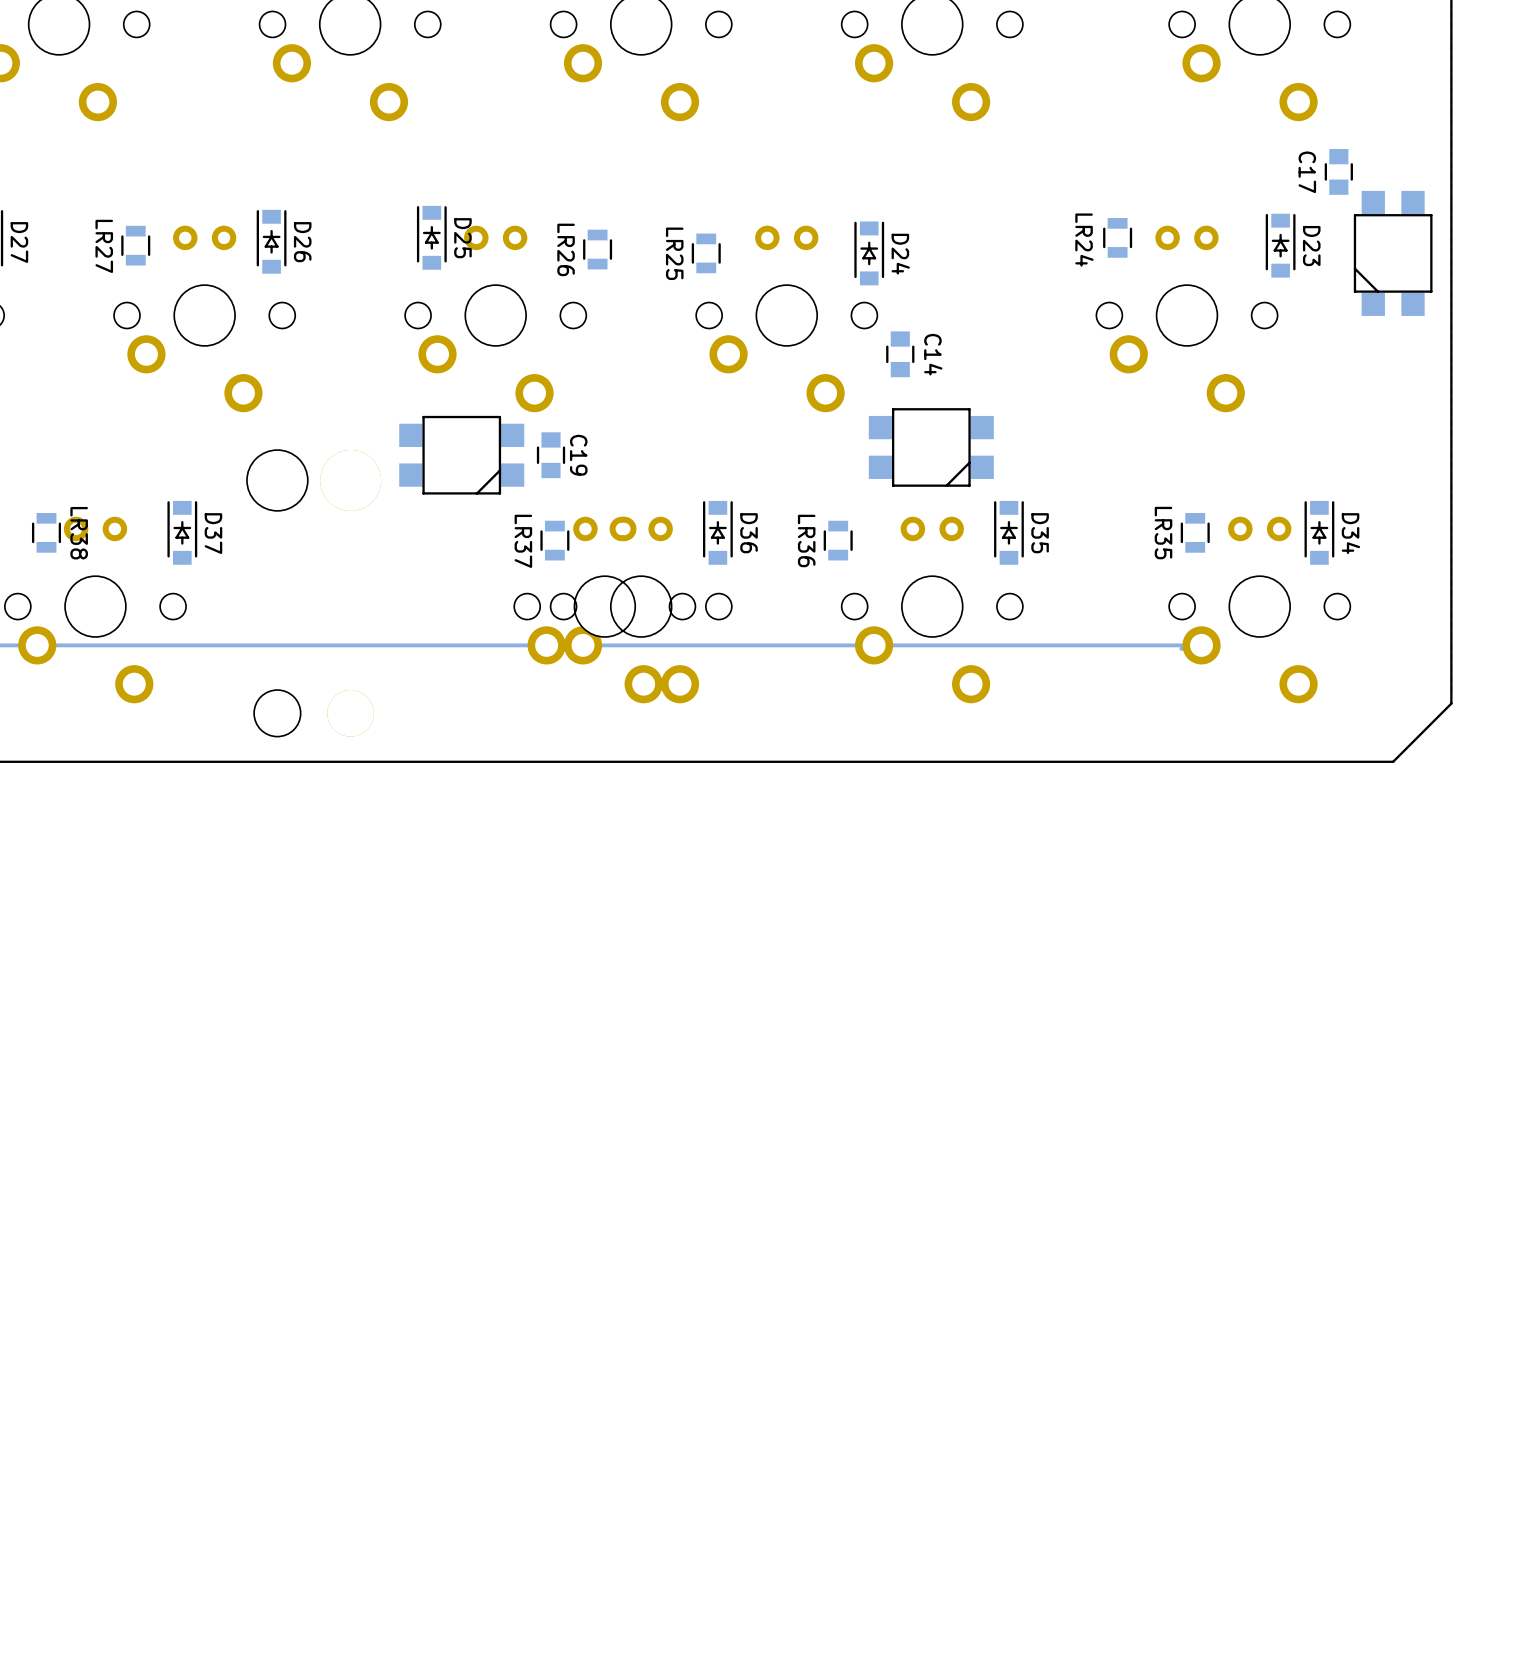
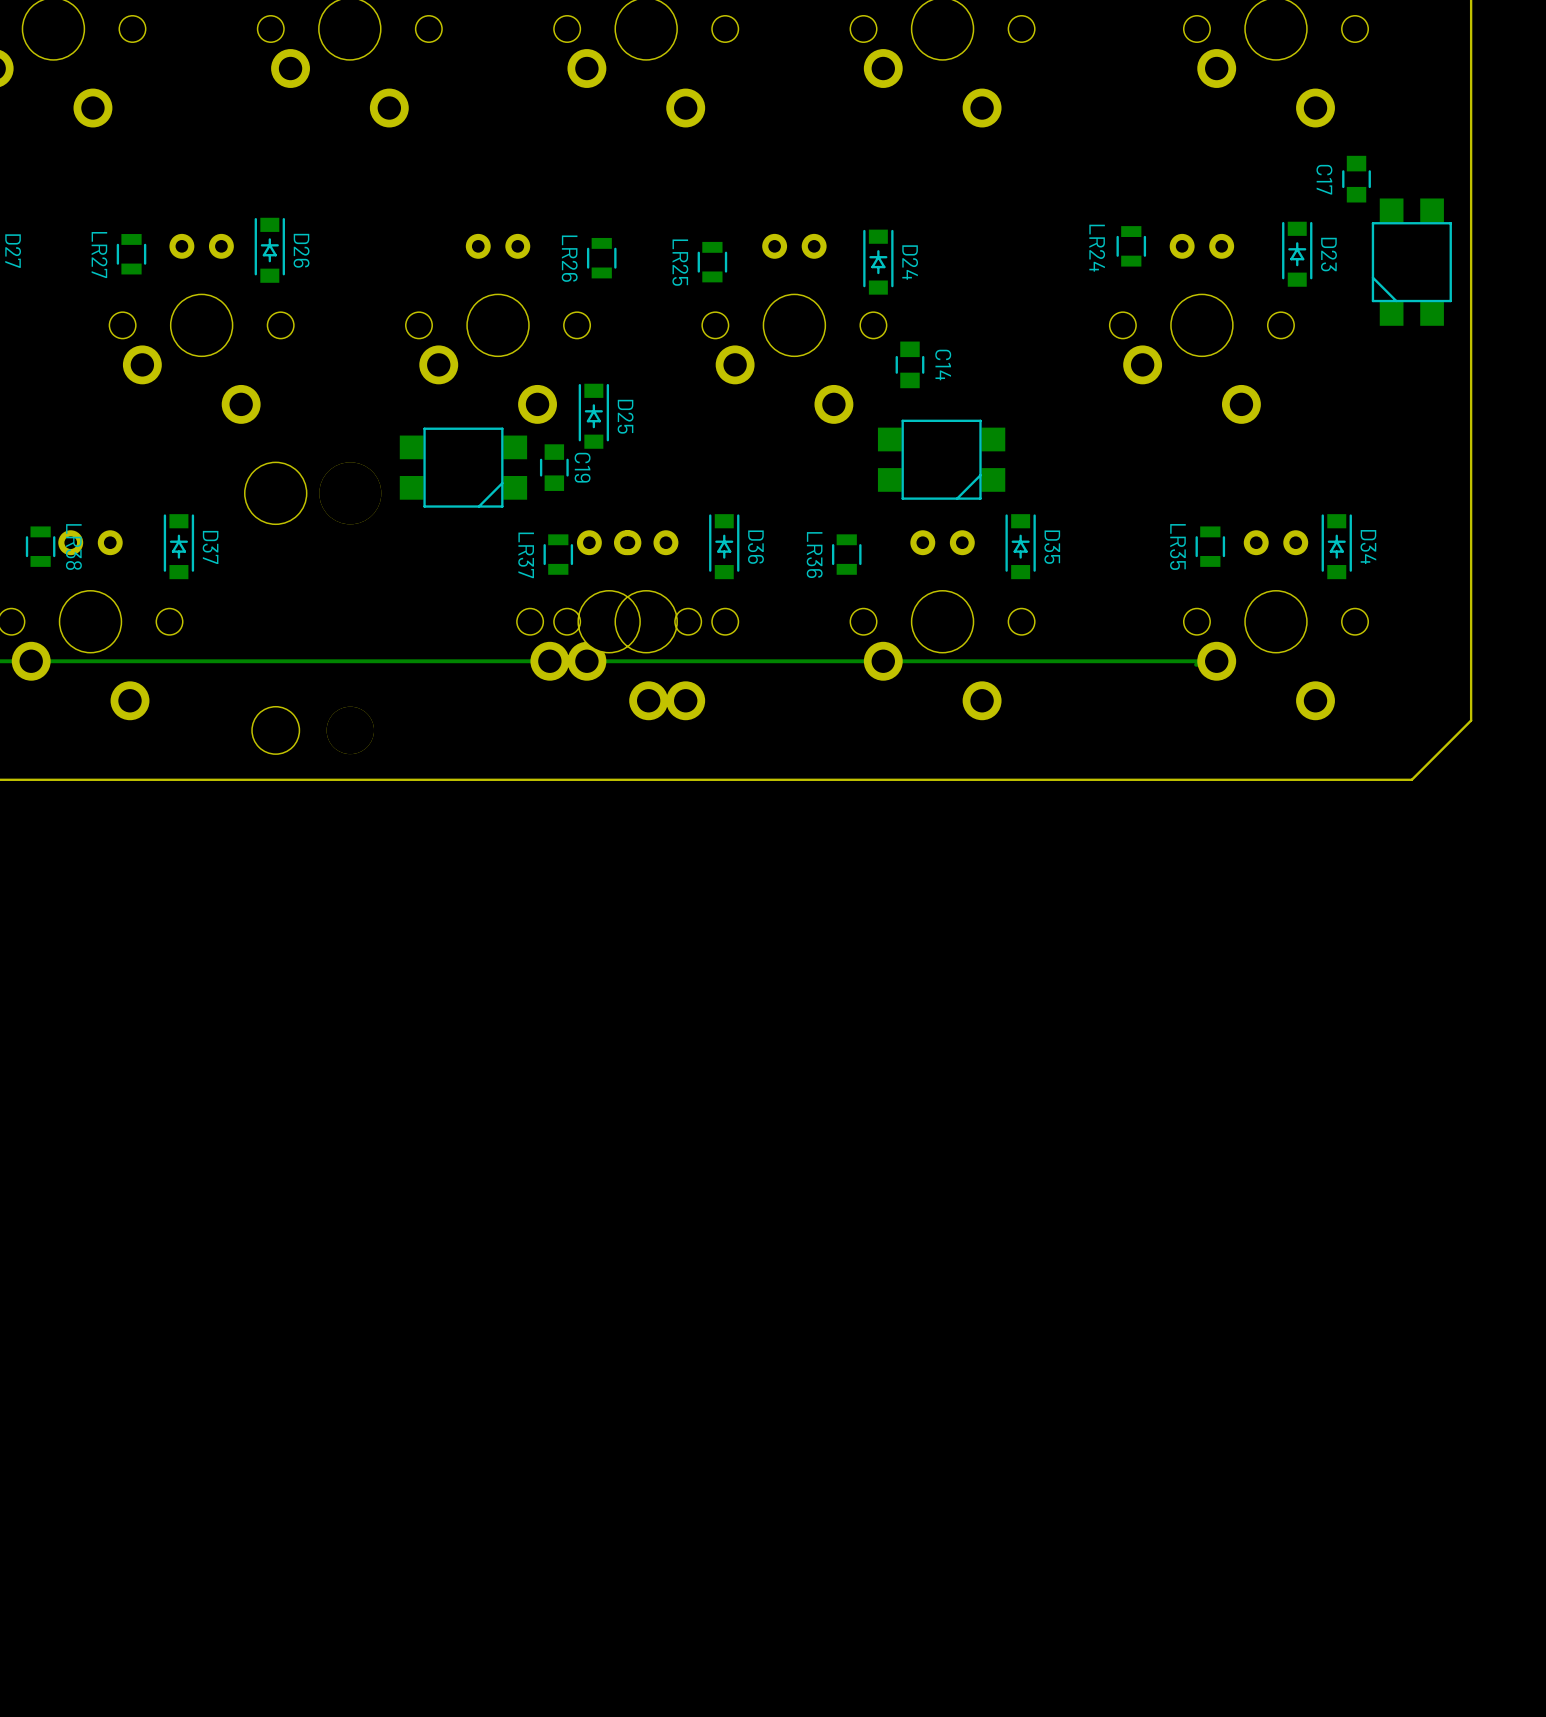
D25 position: (431, 237) -> (593, 416)

